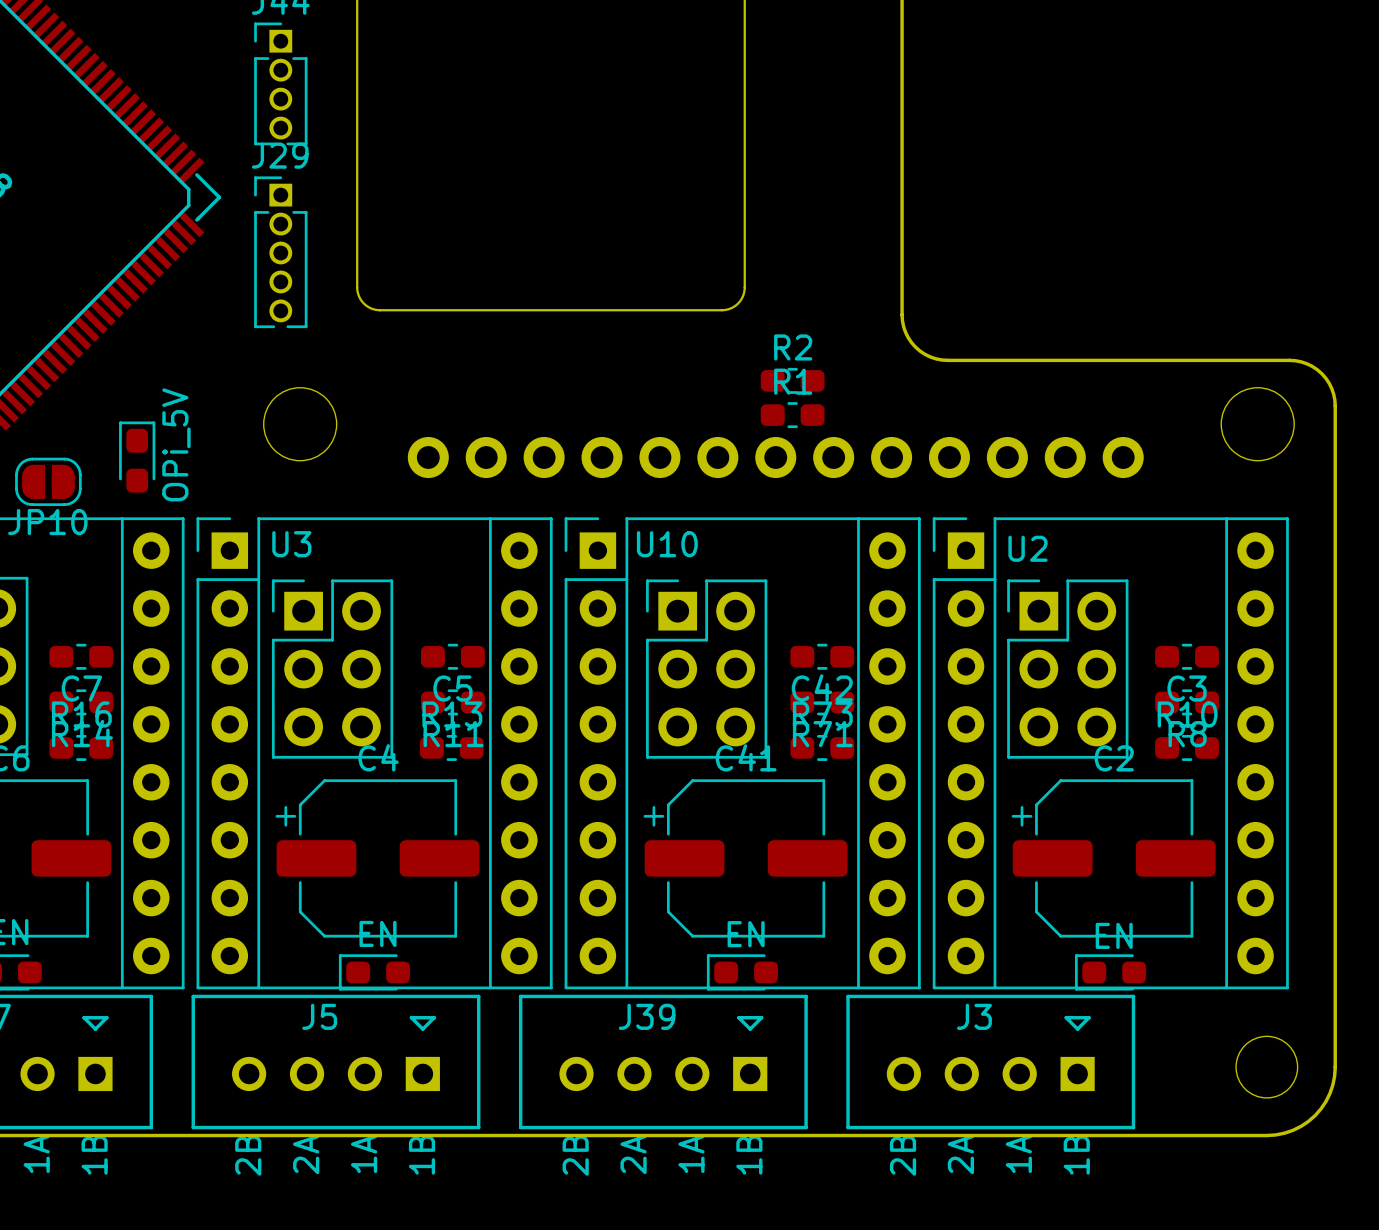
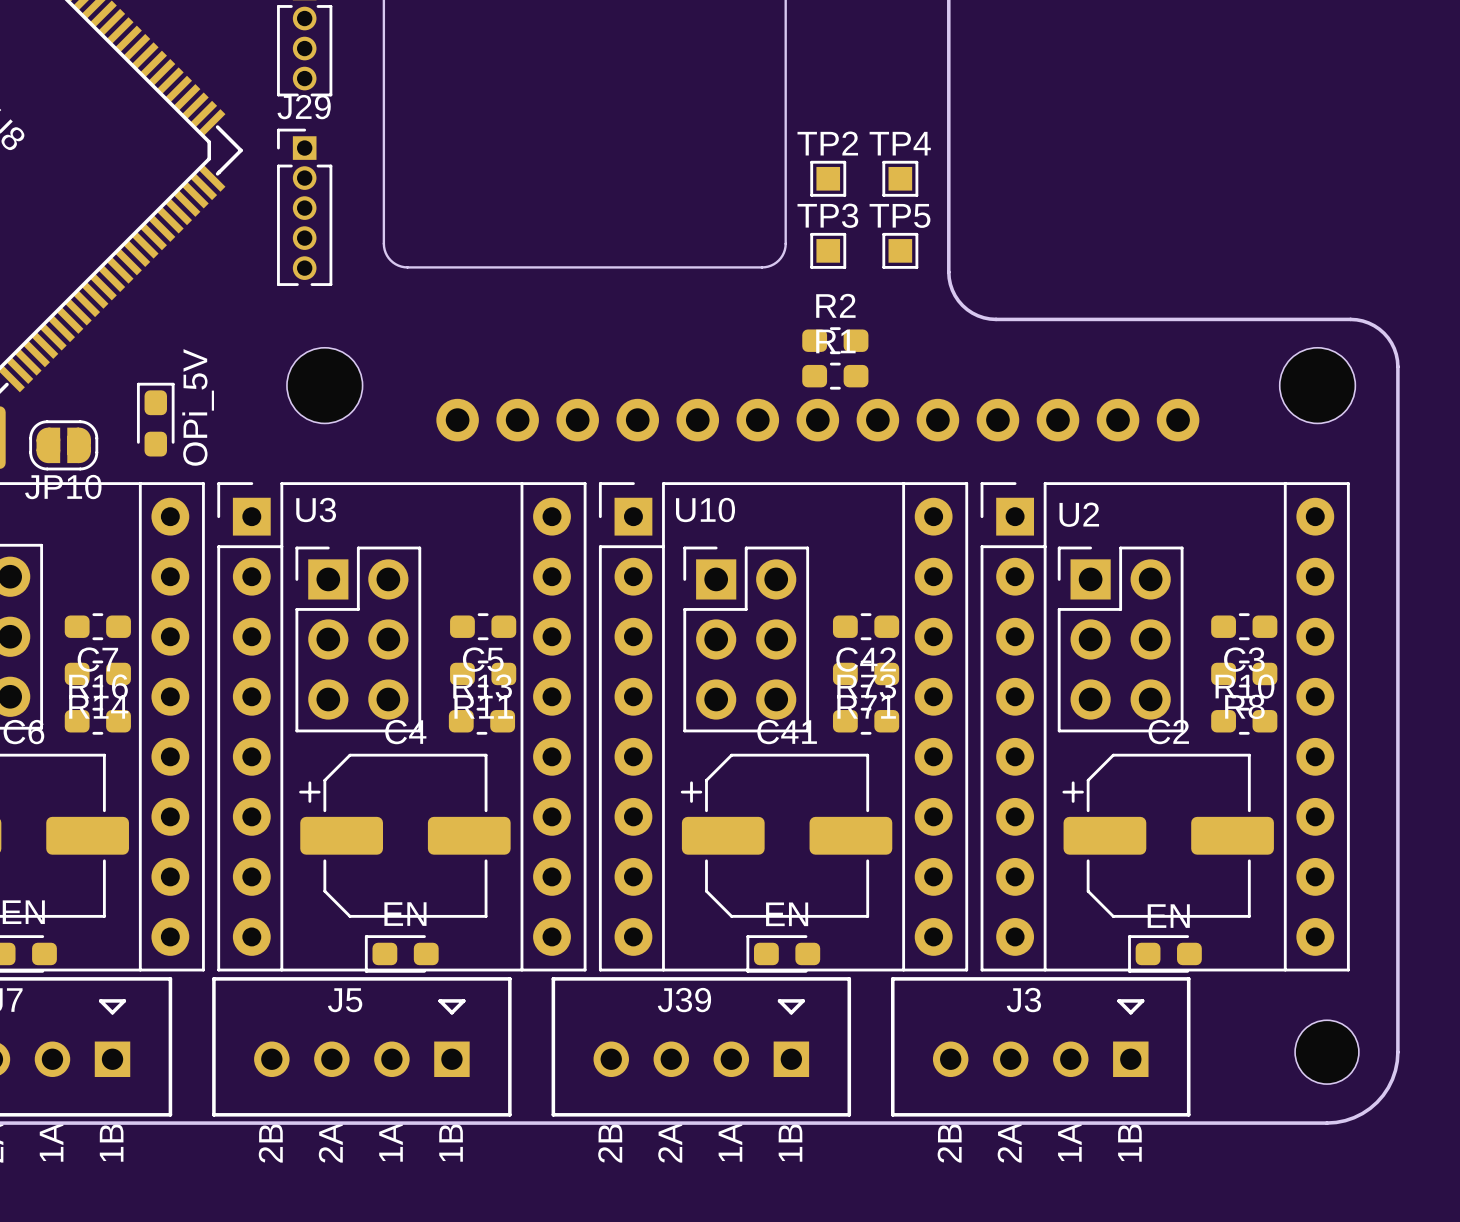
TP2: none -> (828, 178)
TP4: none -> (900, 178)
TP3: none -> (828, 250)
TP5: none -> (900, 250)

